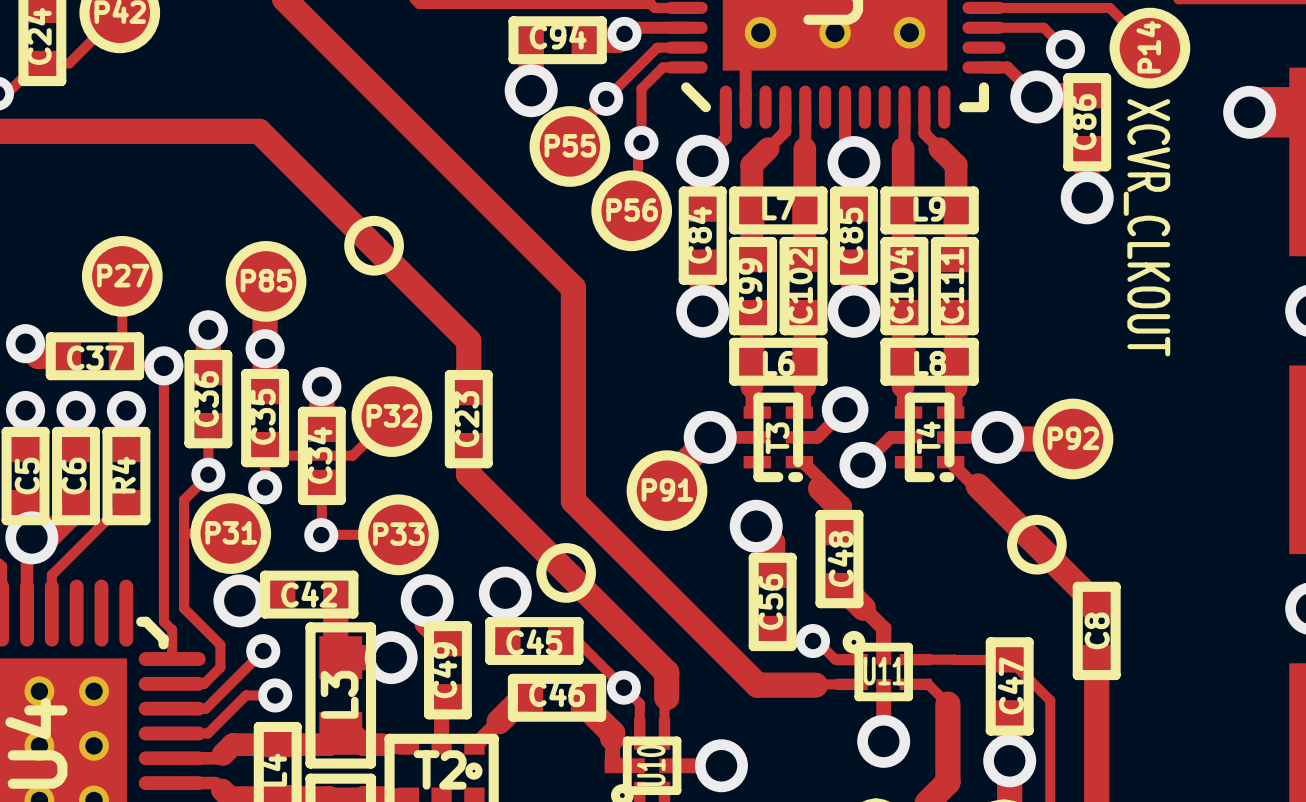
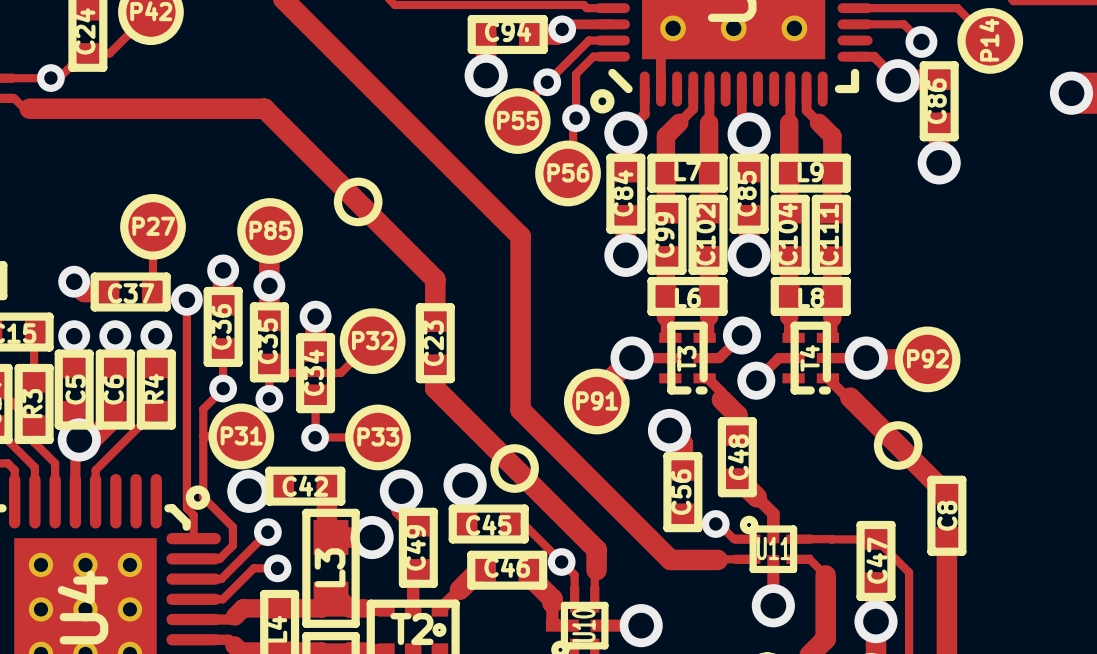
drawing: none -> [590, 89, 615, 114]
text: XCVR_CLKOUT (1146, 227) -> none
drawing: none -> [185, 485, 211, 510]

